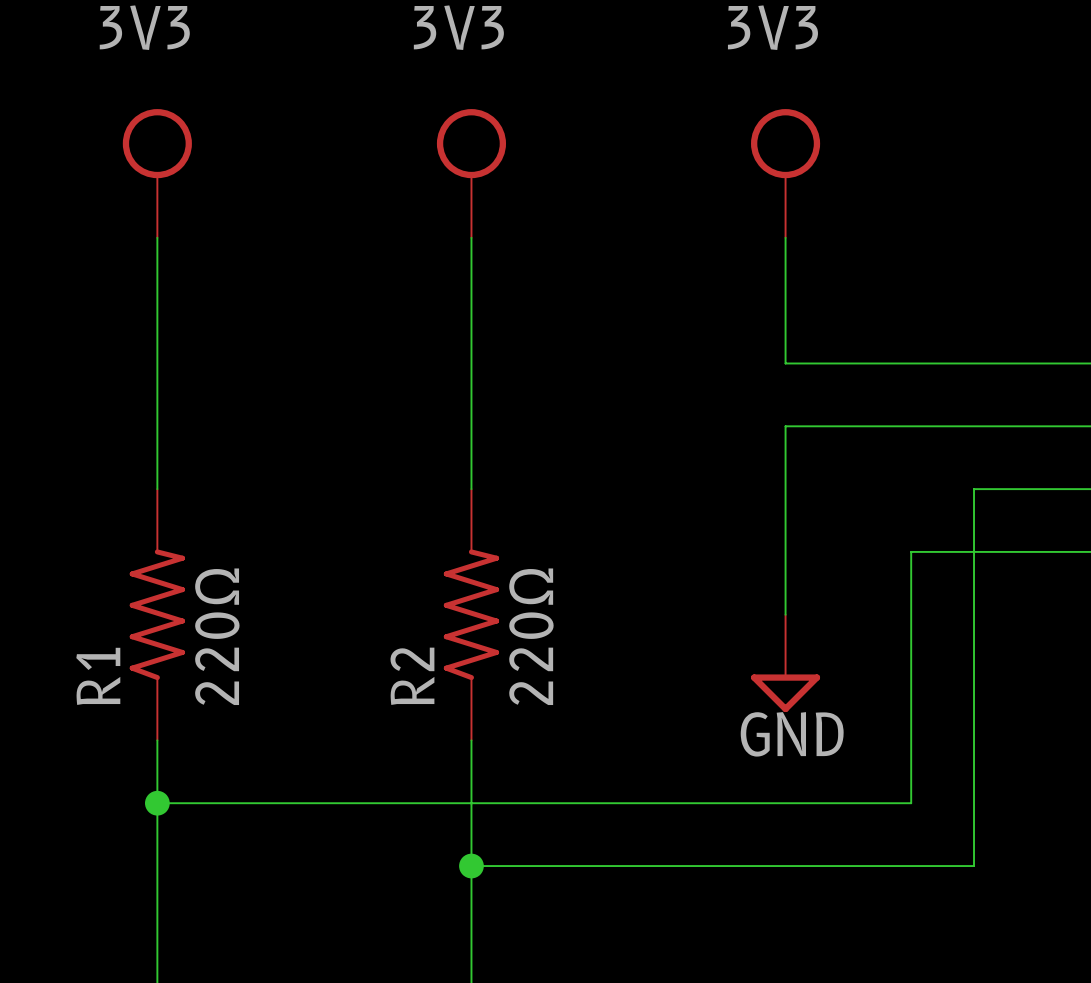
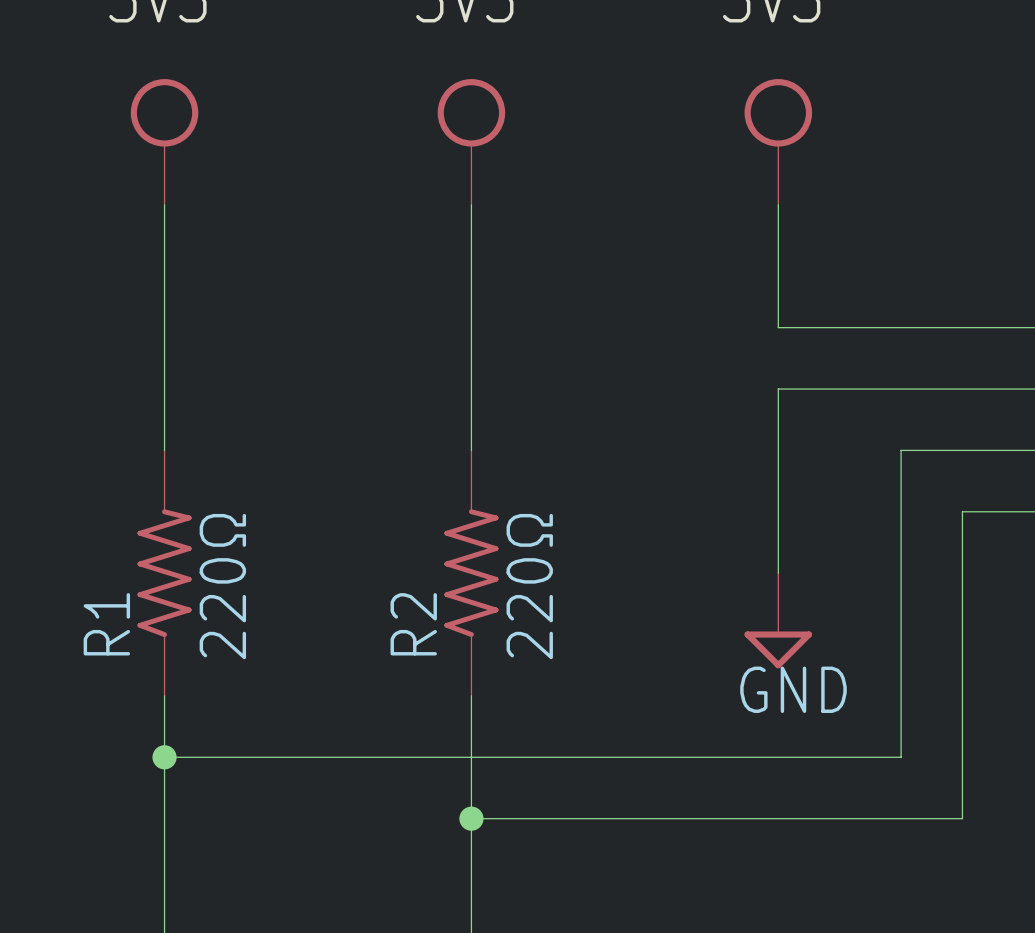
wire: (974, 489) (974, 551) (911, 551) -> (962, 450) (901, 450) (901, 511)

